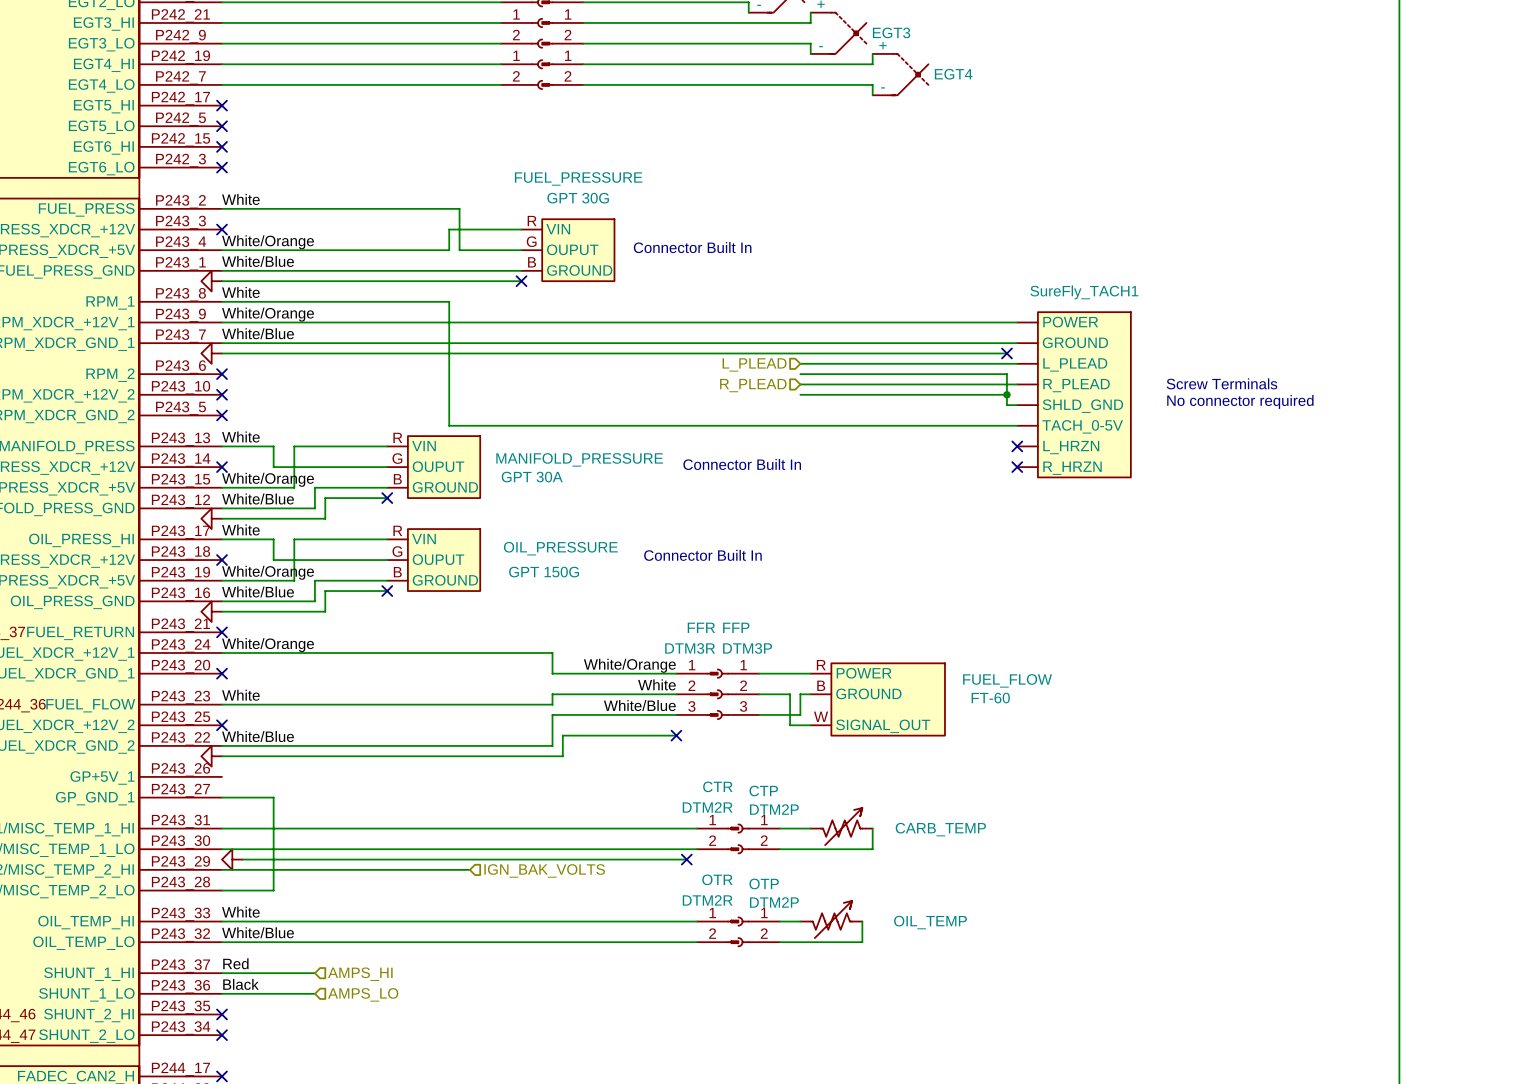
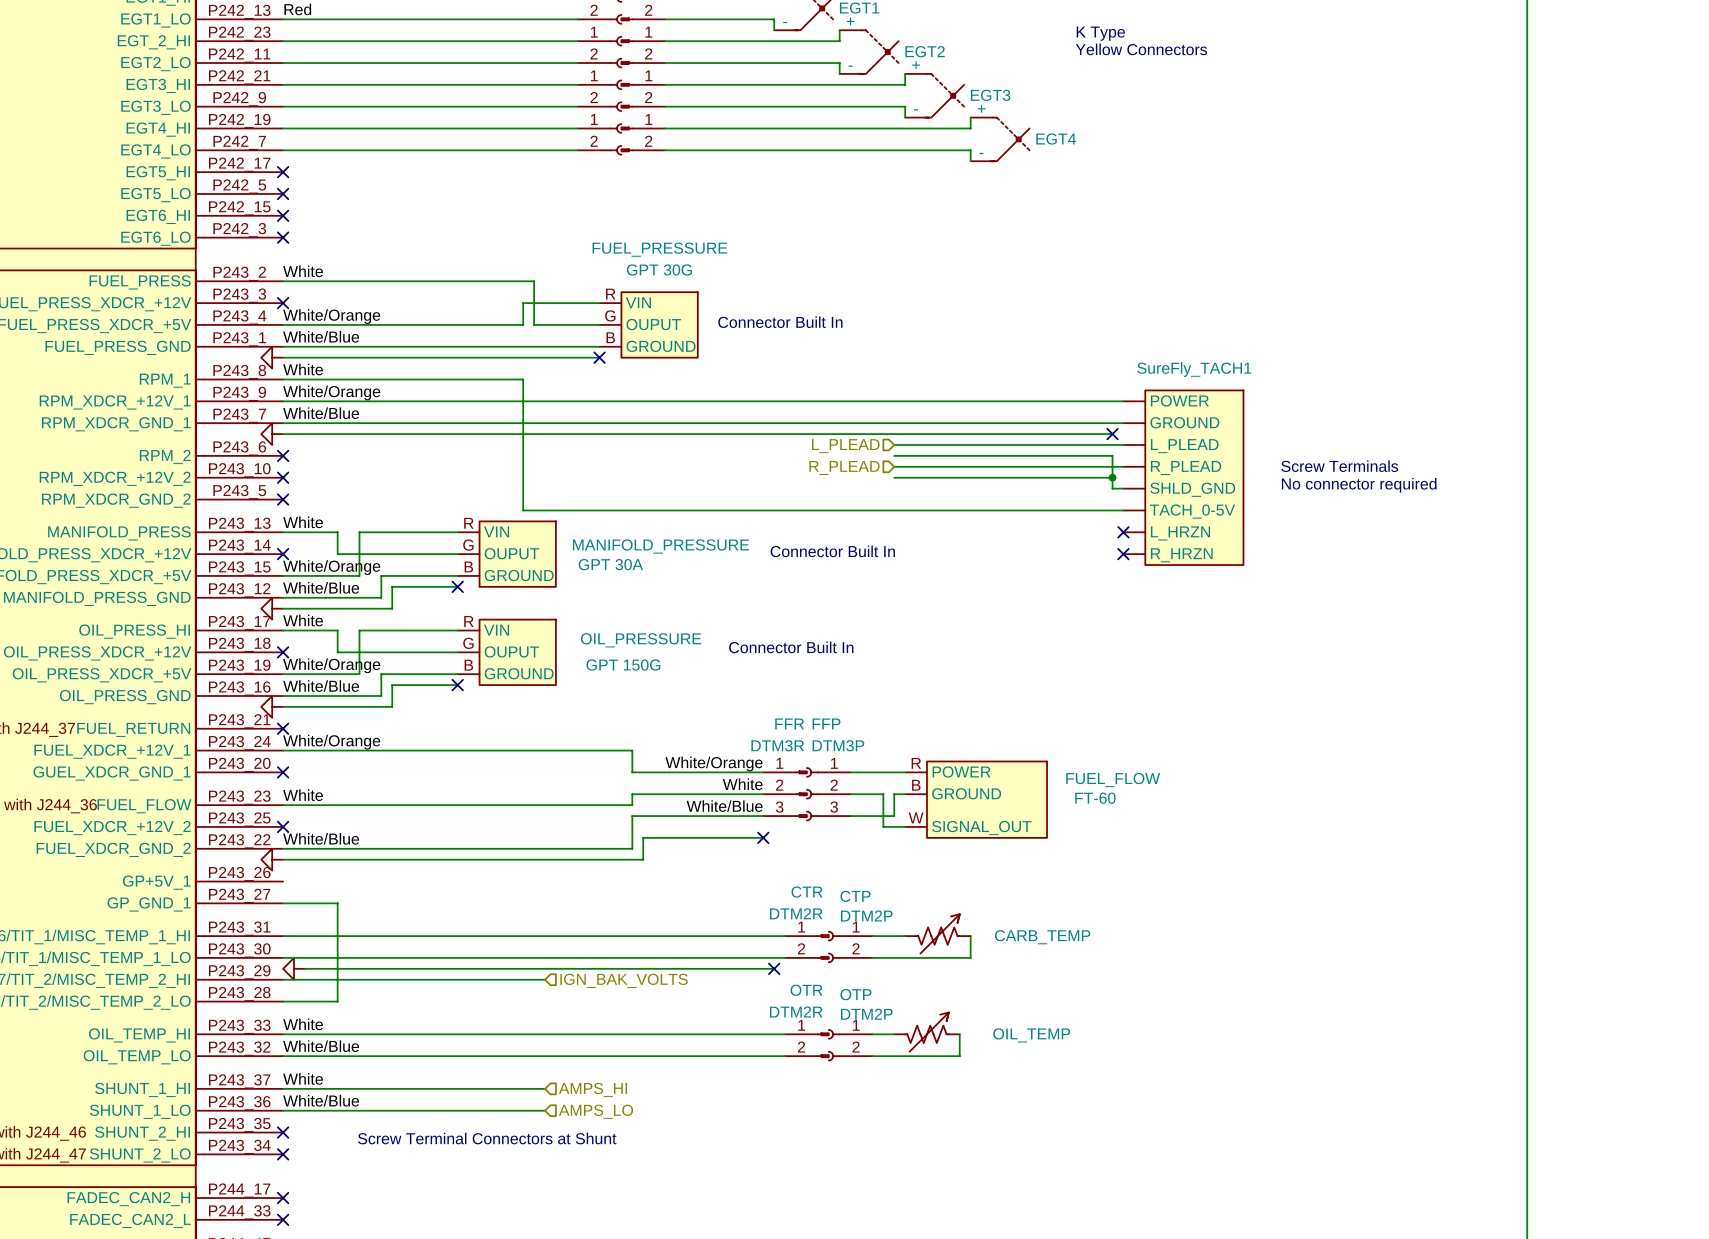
label: Red (235, 963) -> White (303, 1078)
wire: none -> (381, 1088) (545, 1088)
hierarchical label position: AMPS_HI (360, 974) -> AMPS_HI (592, 1089)
label: Black (240, 984) -> White/Blue (321, 1100)
wire: none -> (381, 1110) (545, 1110)
hierarchical label position: AMPS_LO (363, 994) -> AMPS_LO (595, 1111)
text: none -> Screw Terminal Connectors at Shunt (487, 1138)

